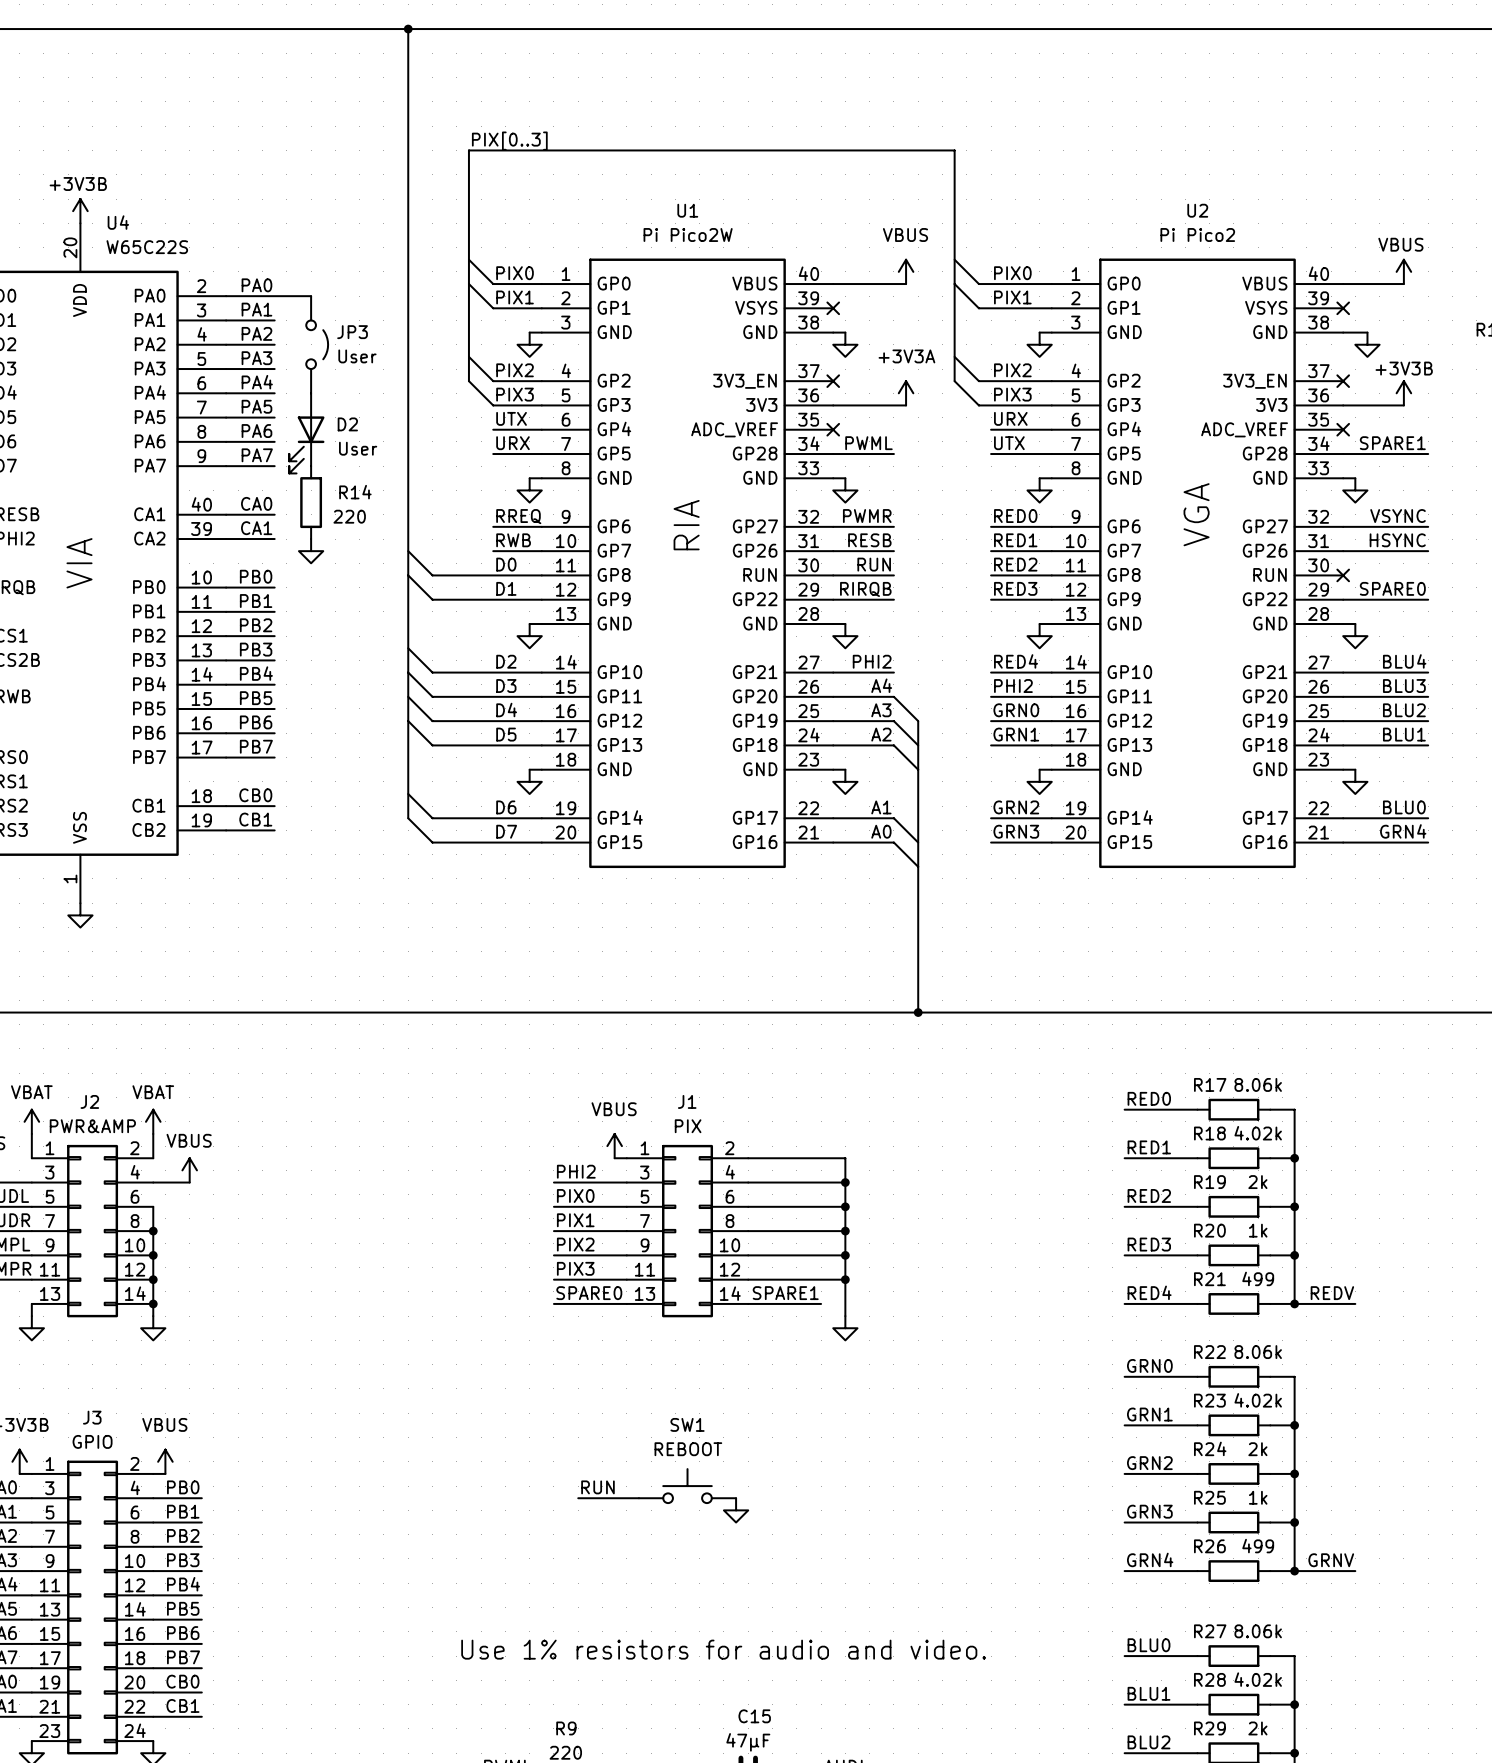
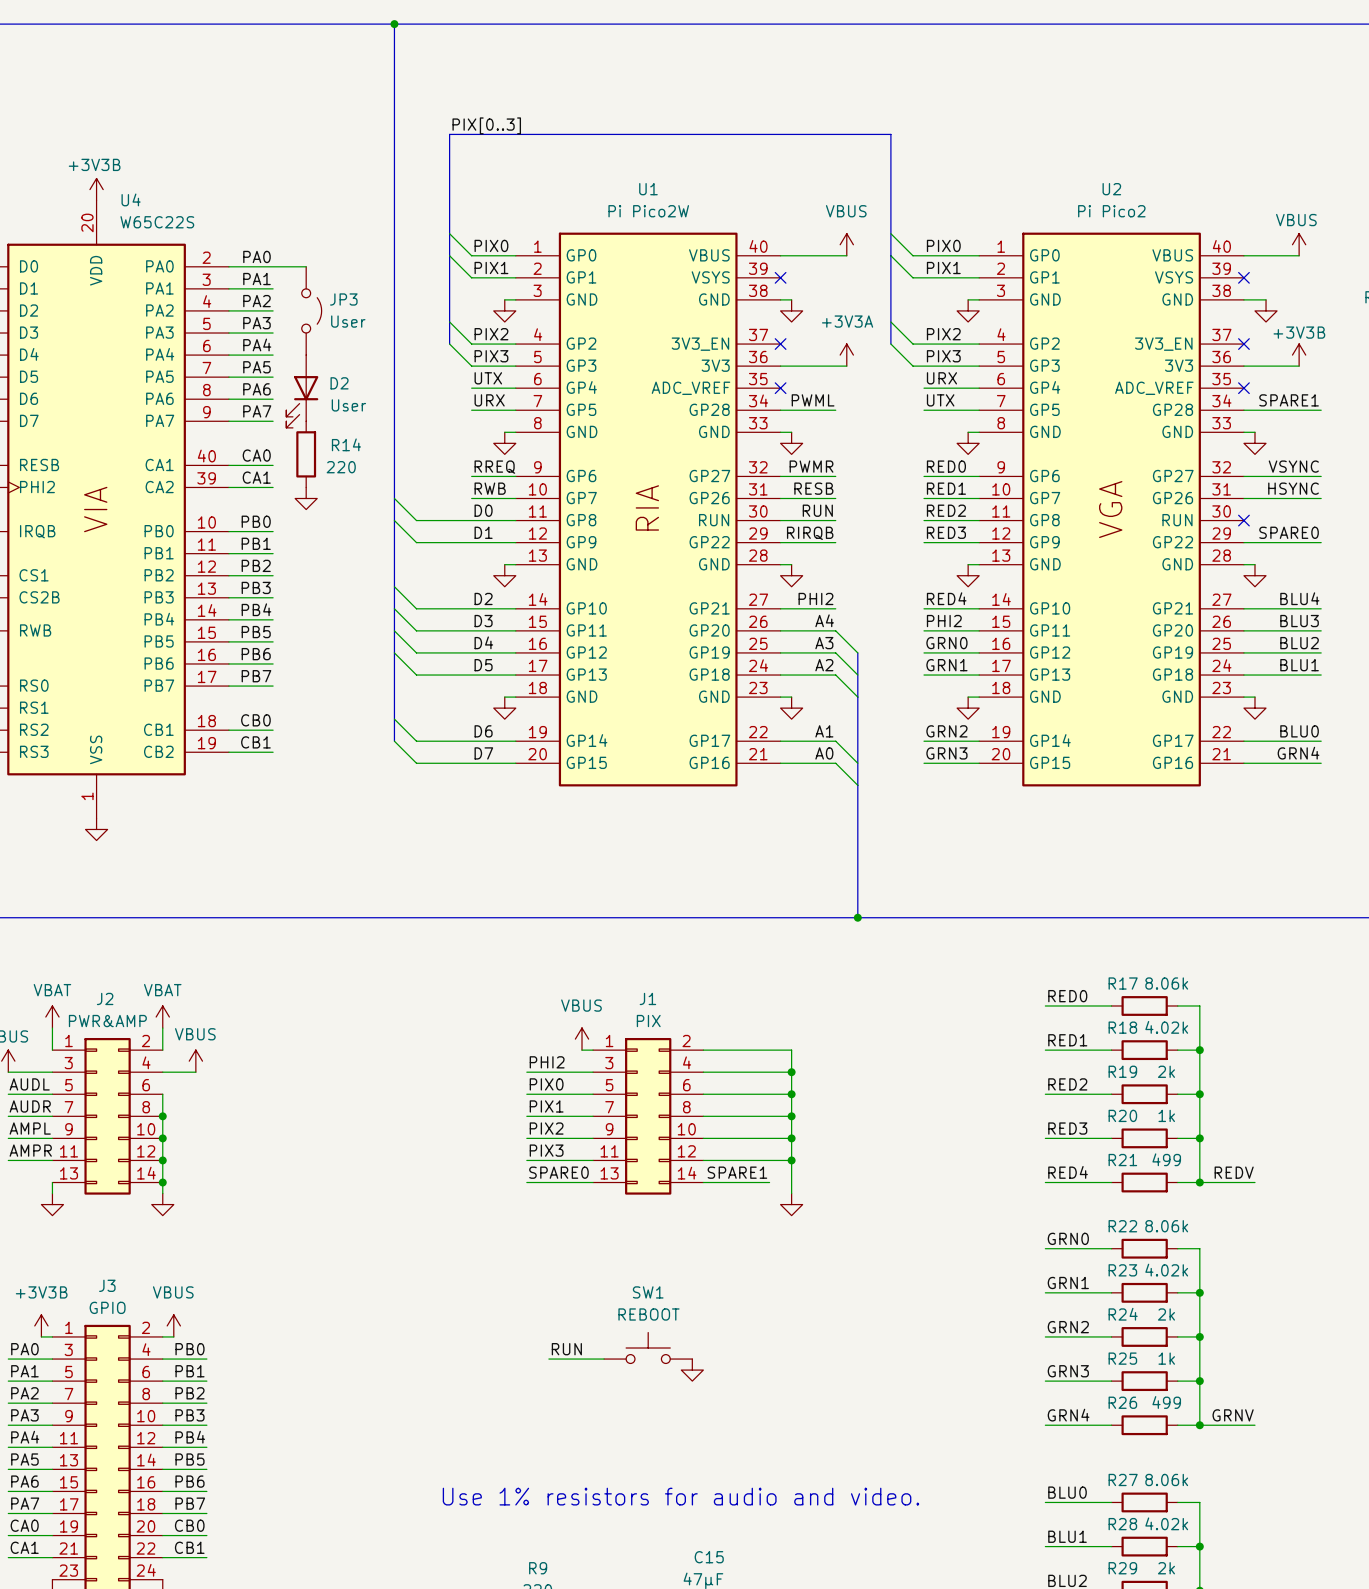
U2 text position: VGA (1196, 514) -> VGA (1110, 509)
U1 text position: RIA (686, 525) -> RIA (647, 507)

